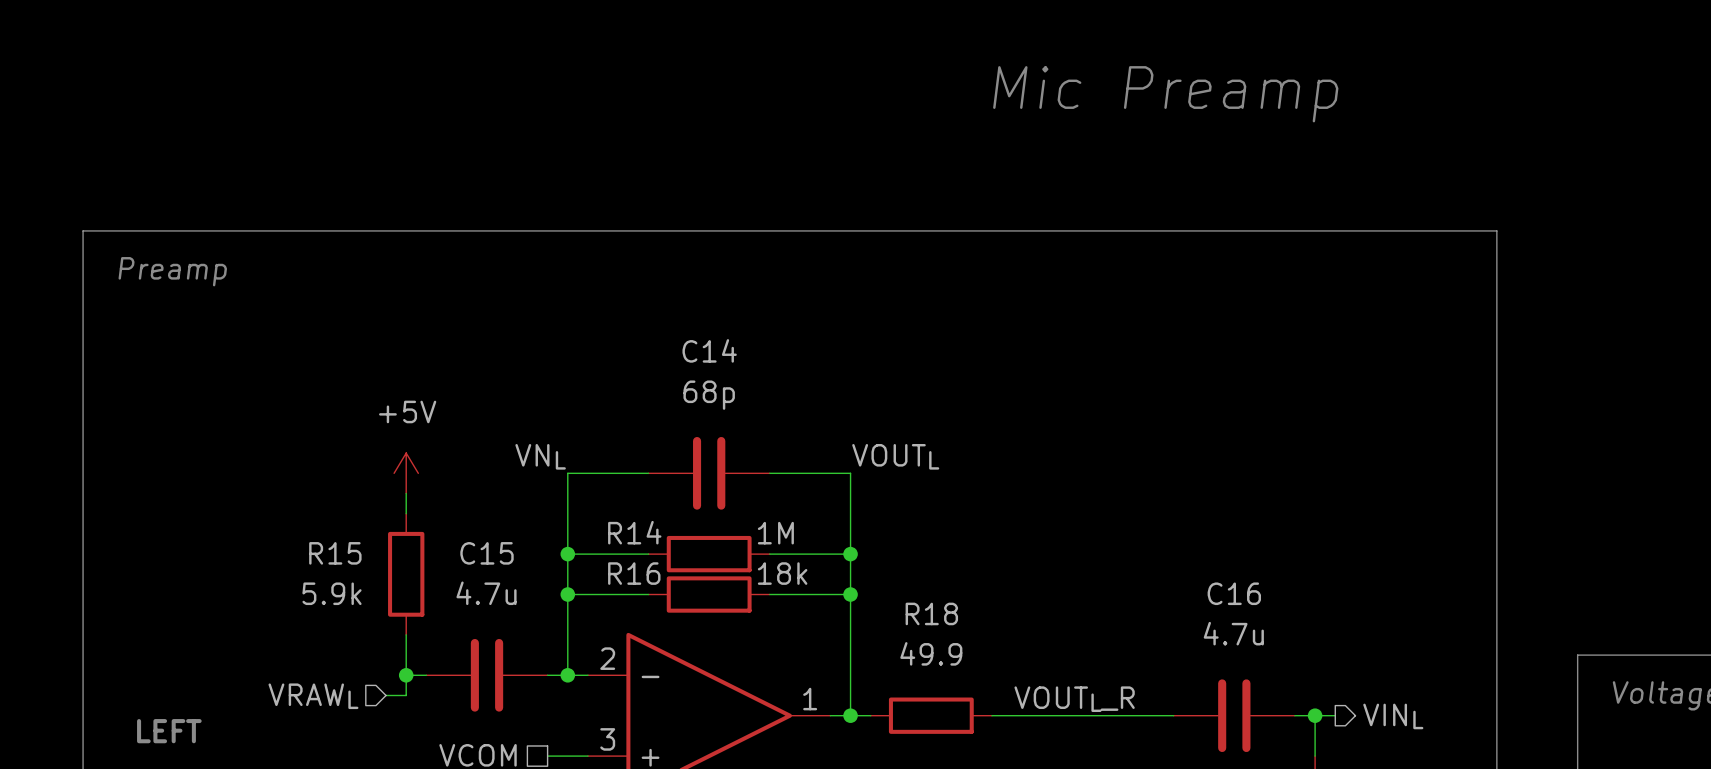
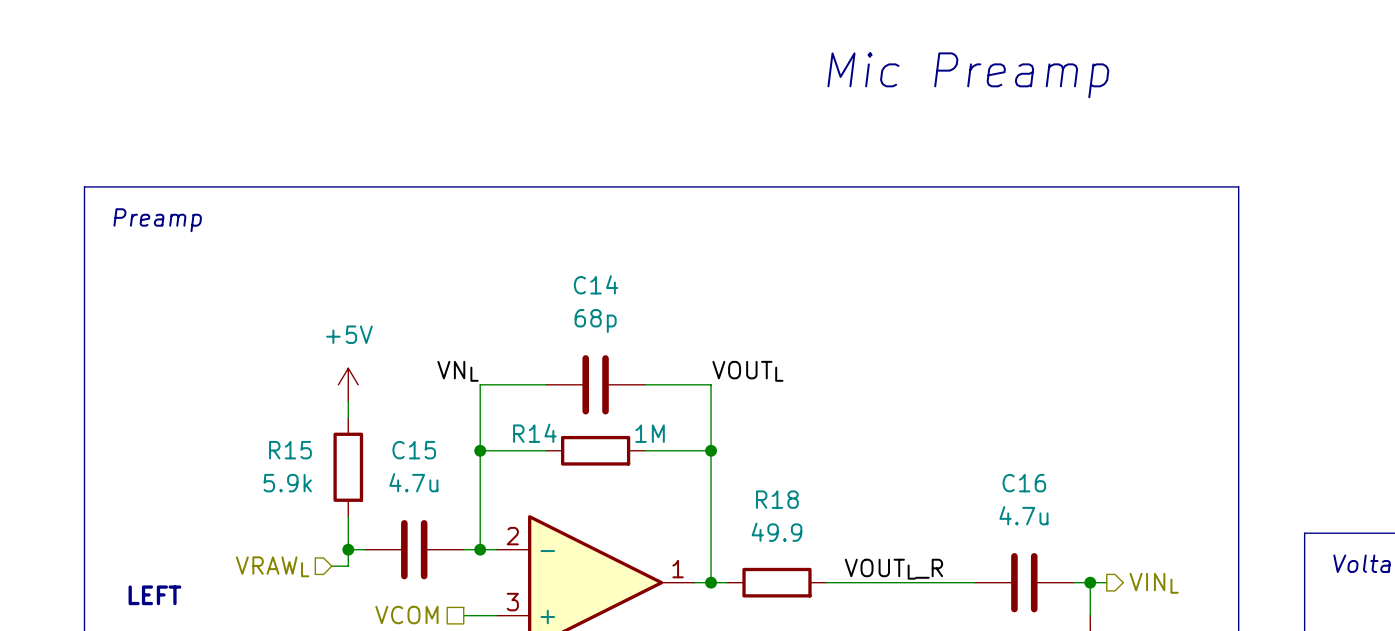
wire: (567, 594) (648, 594) -> none
junction: (567, 594) -> none
R16: 18k (709, 594) -> none
wire: (769, 594) (850, 594) -> none
junction: (850, 594) -> none

